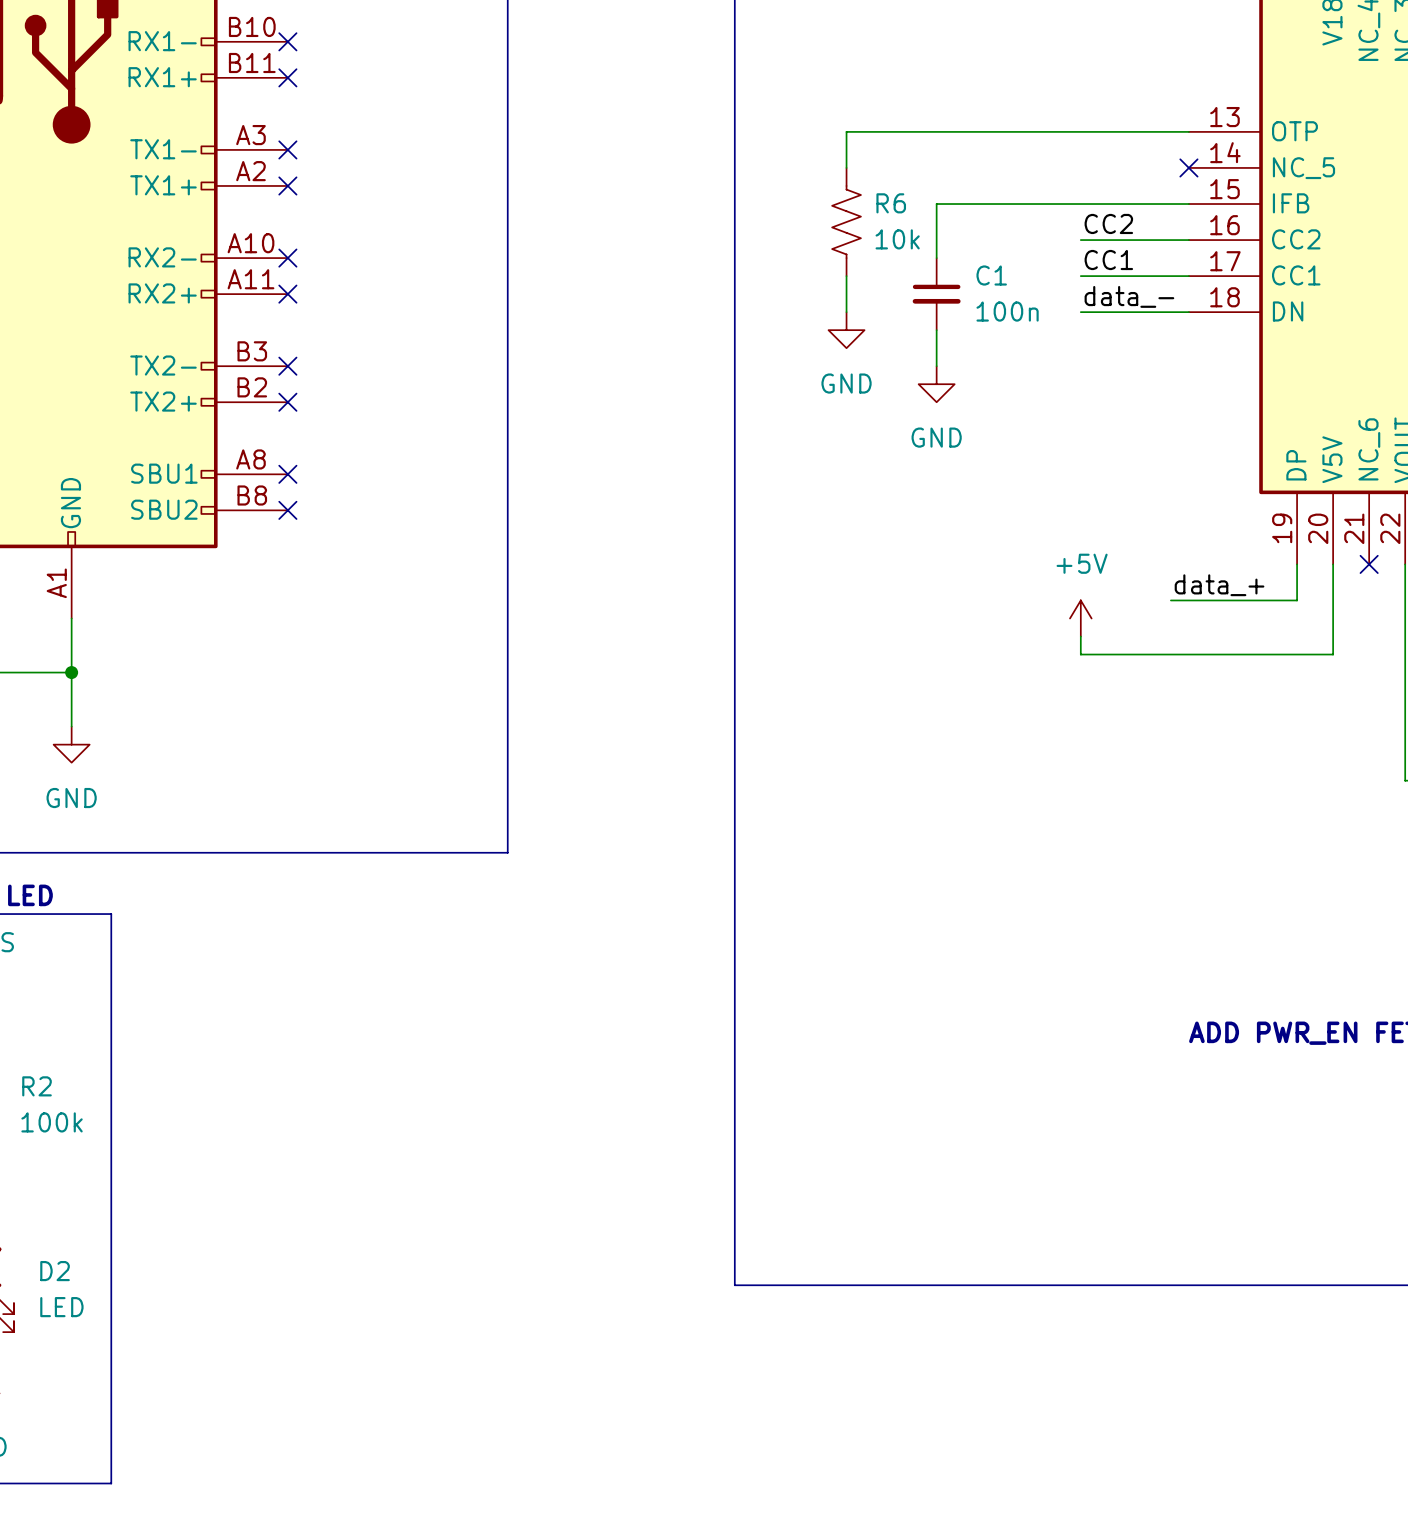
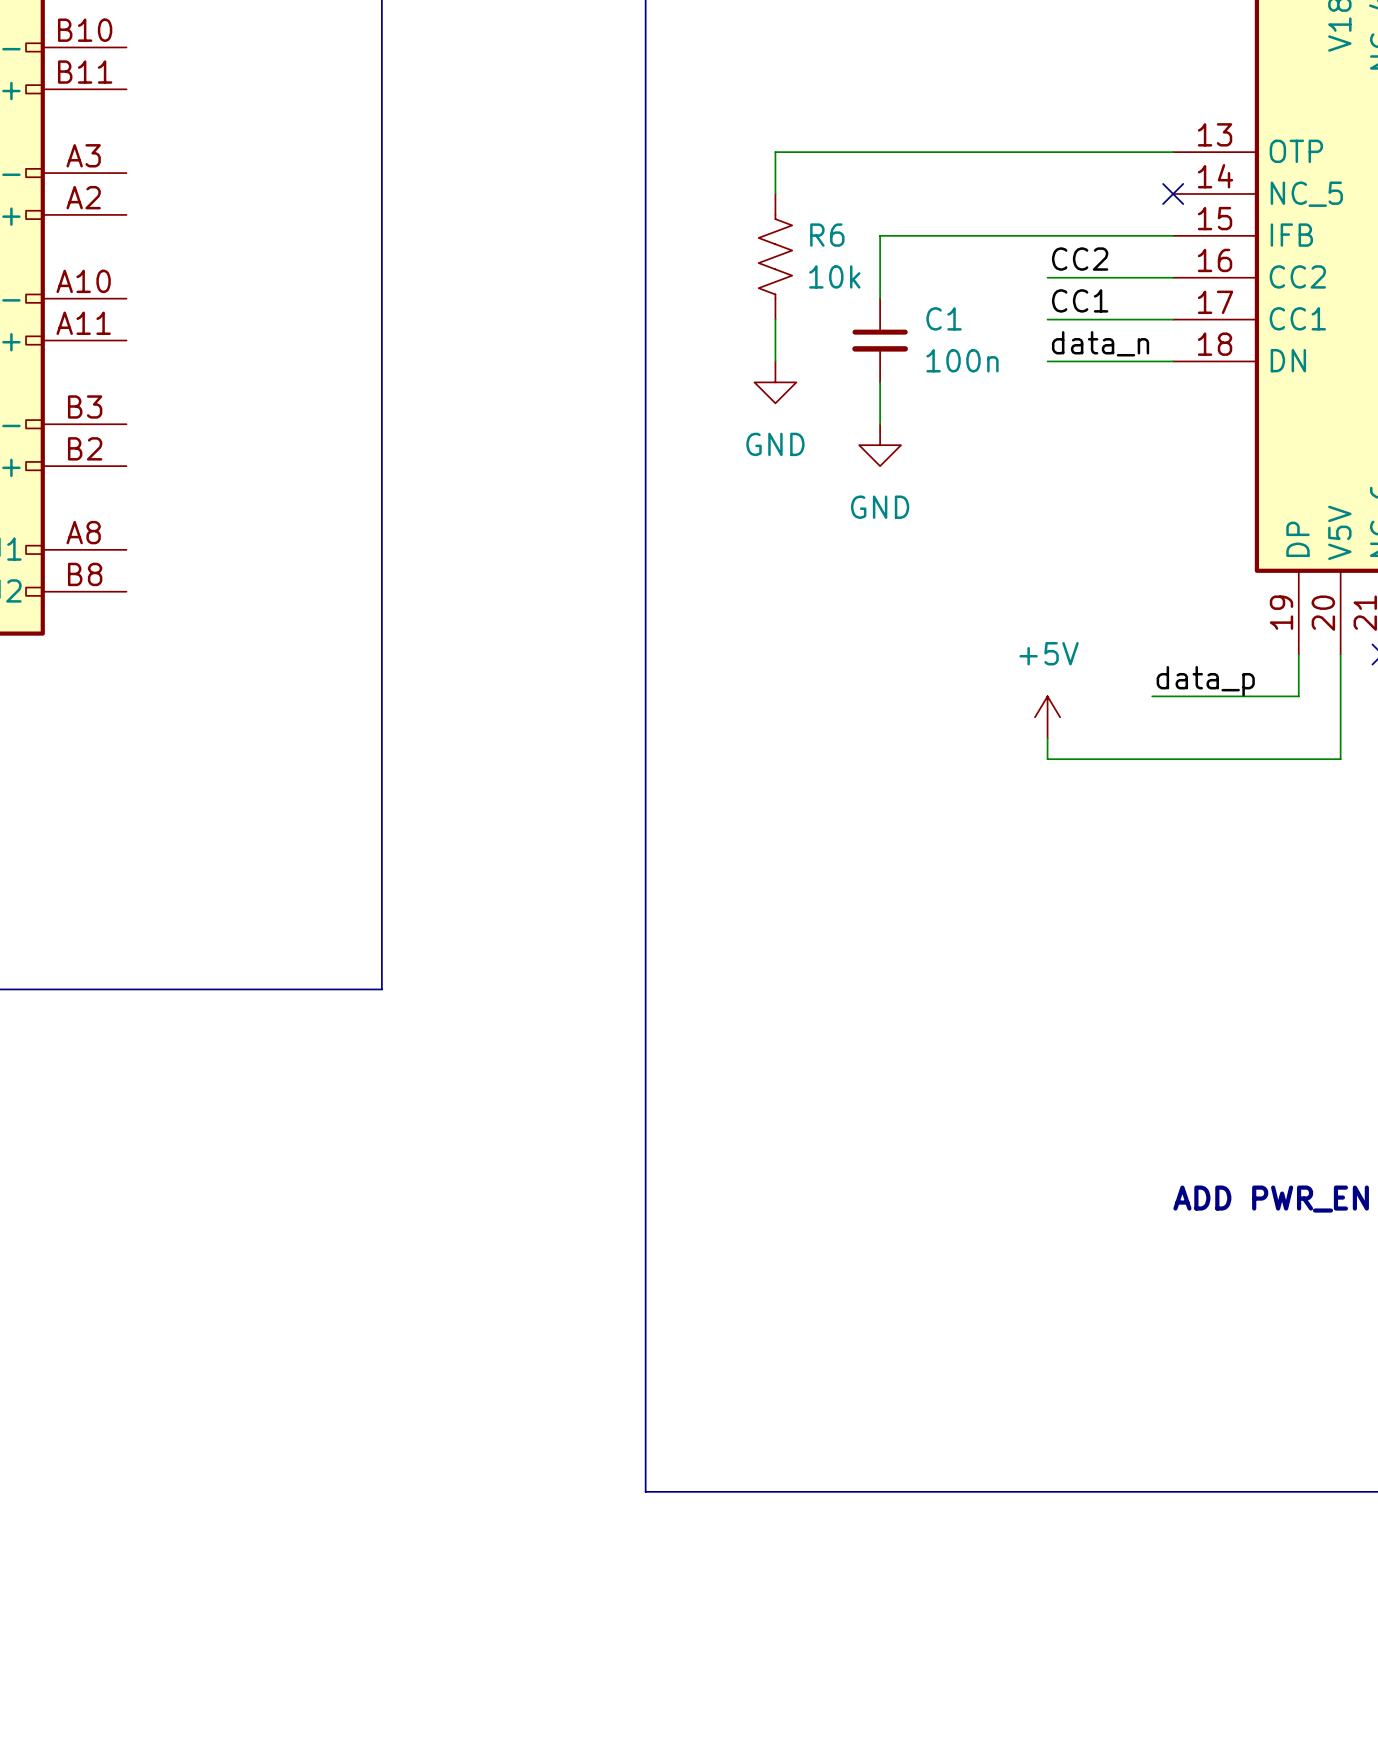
no-connect mark: (287, 41) -> none
no-connect mark: (287, 77) -> none
no-connect mark: (287, 149) -> none
no-connect mark: (287, 185) -> none
no-connect mark: (287, 258) -> none
no-connect mark: (287, 294) -> none
label: data_- (1129, 296) -> data_n (1100, 343)
no-connect mark: (287, 366) -> none
no-connect mark: (287, 402) -> none
no-connect mark: (287, 474) -> none
no-connect mark: (287, 510) -> none
label: data_+ (1219, 585) -> data_p (1205, 681)

